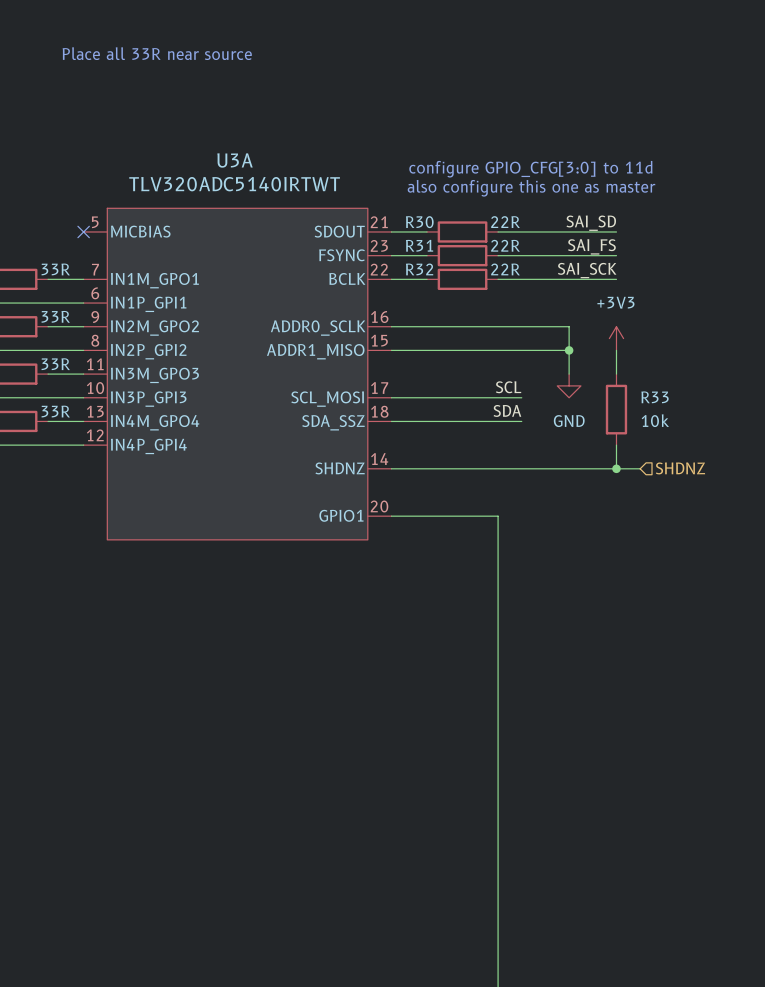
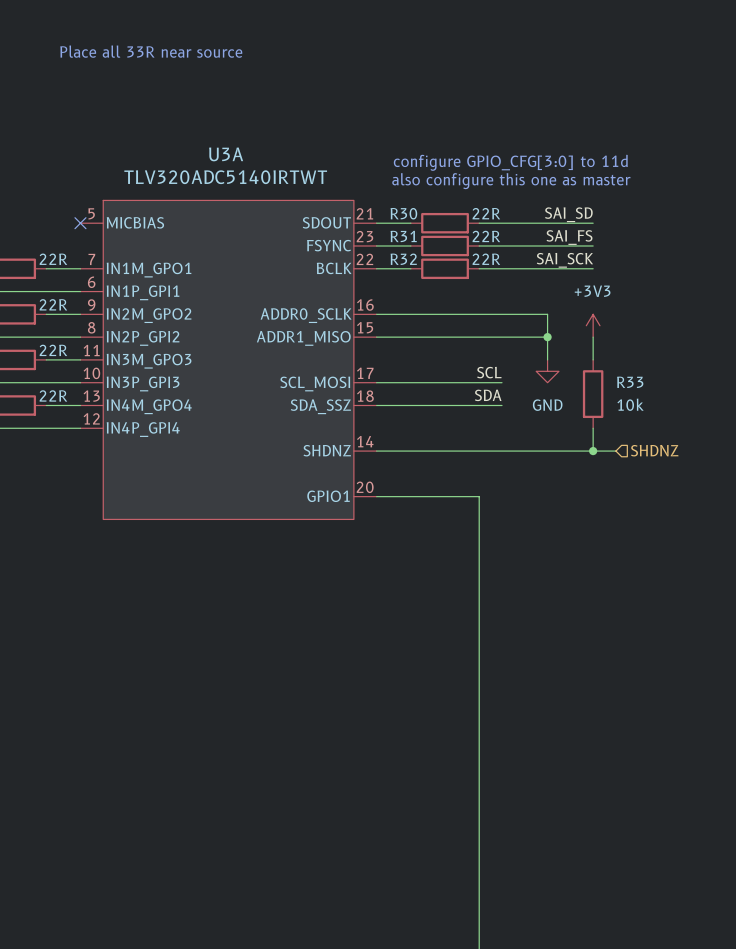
part value: 33R (55, 269) -> 22R (53, 259)
part value: 33R (55, 316) -> 22R (53, 304)
part value: 33R (55, 364) -> 22R (53, 350)
part value: 33R (55, 411) -> 22R (53, 395)

